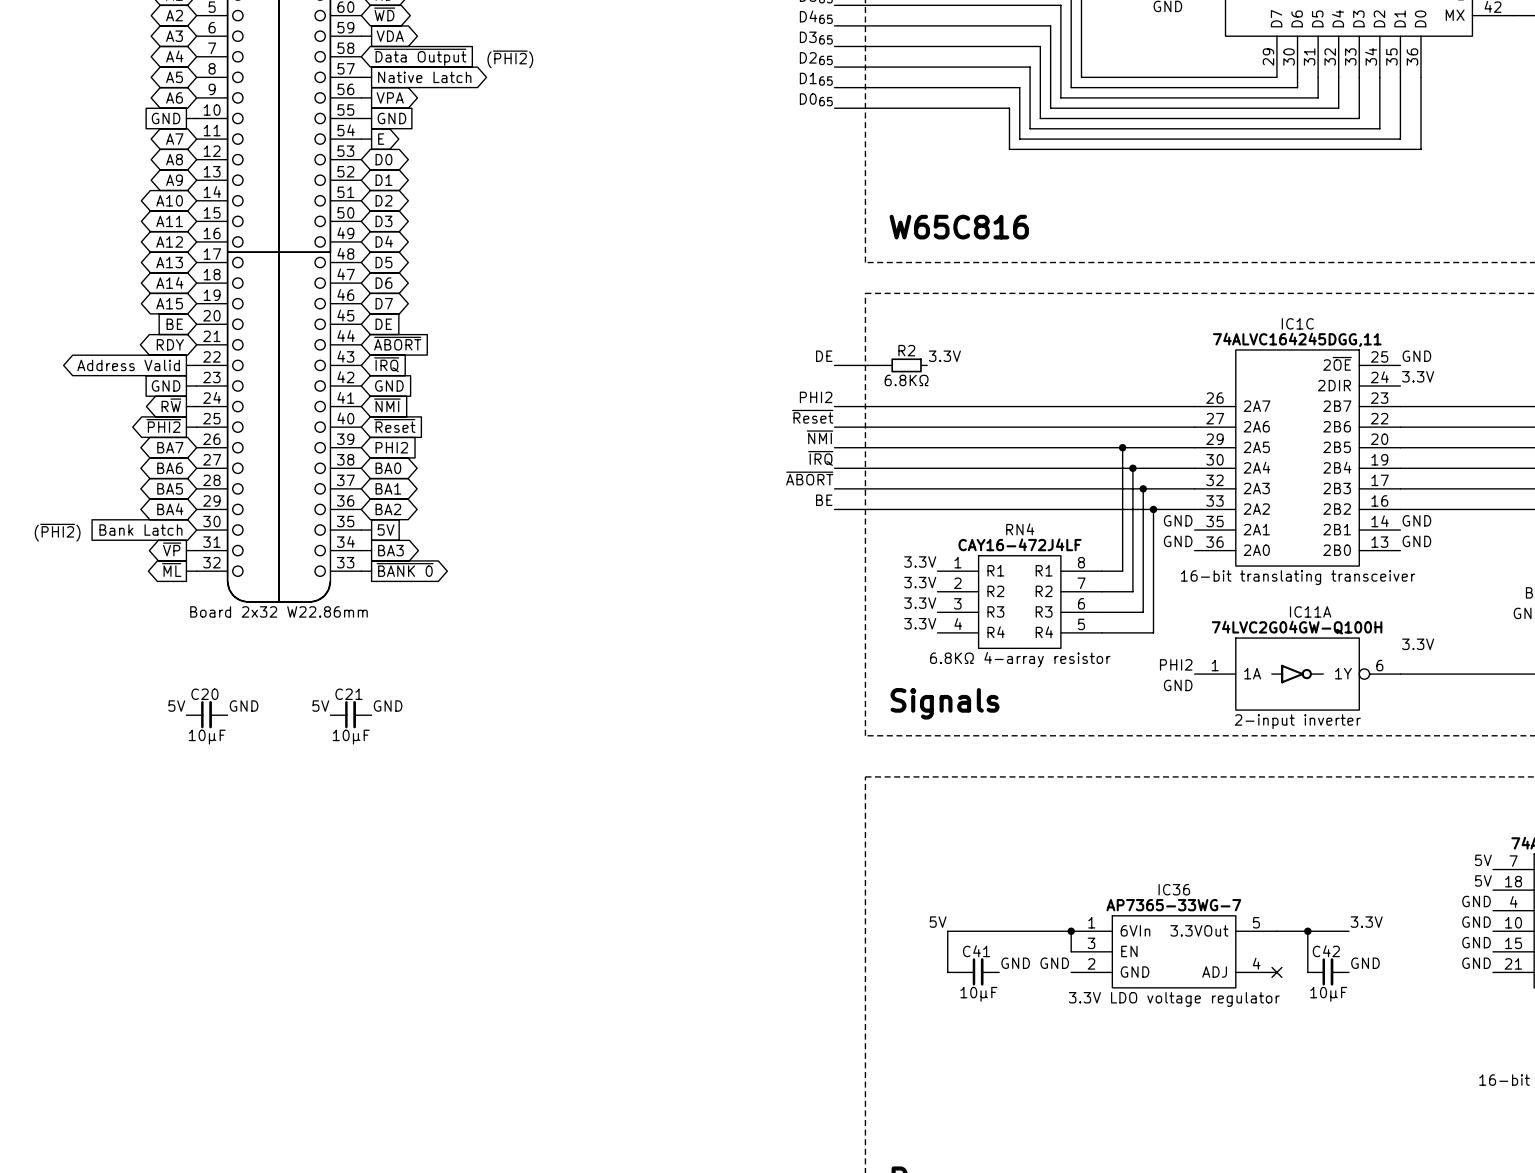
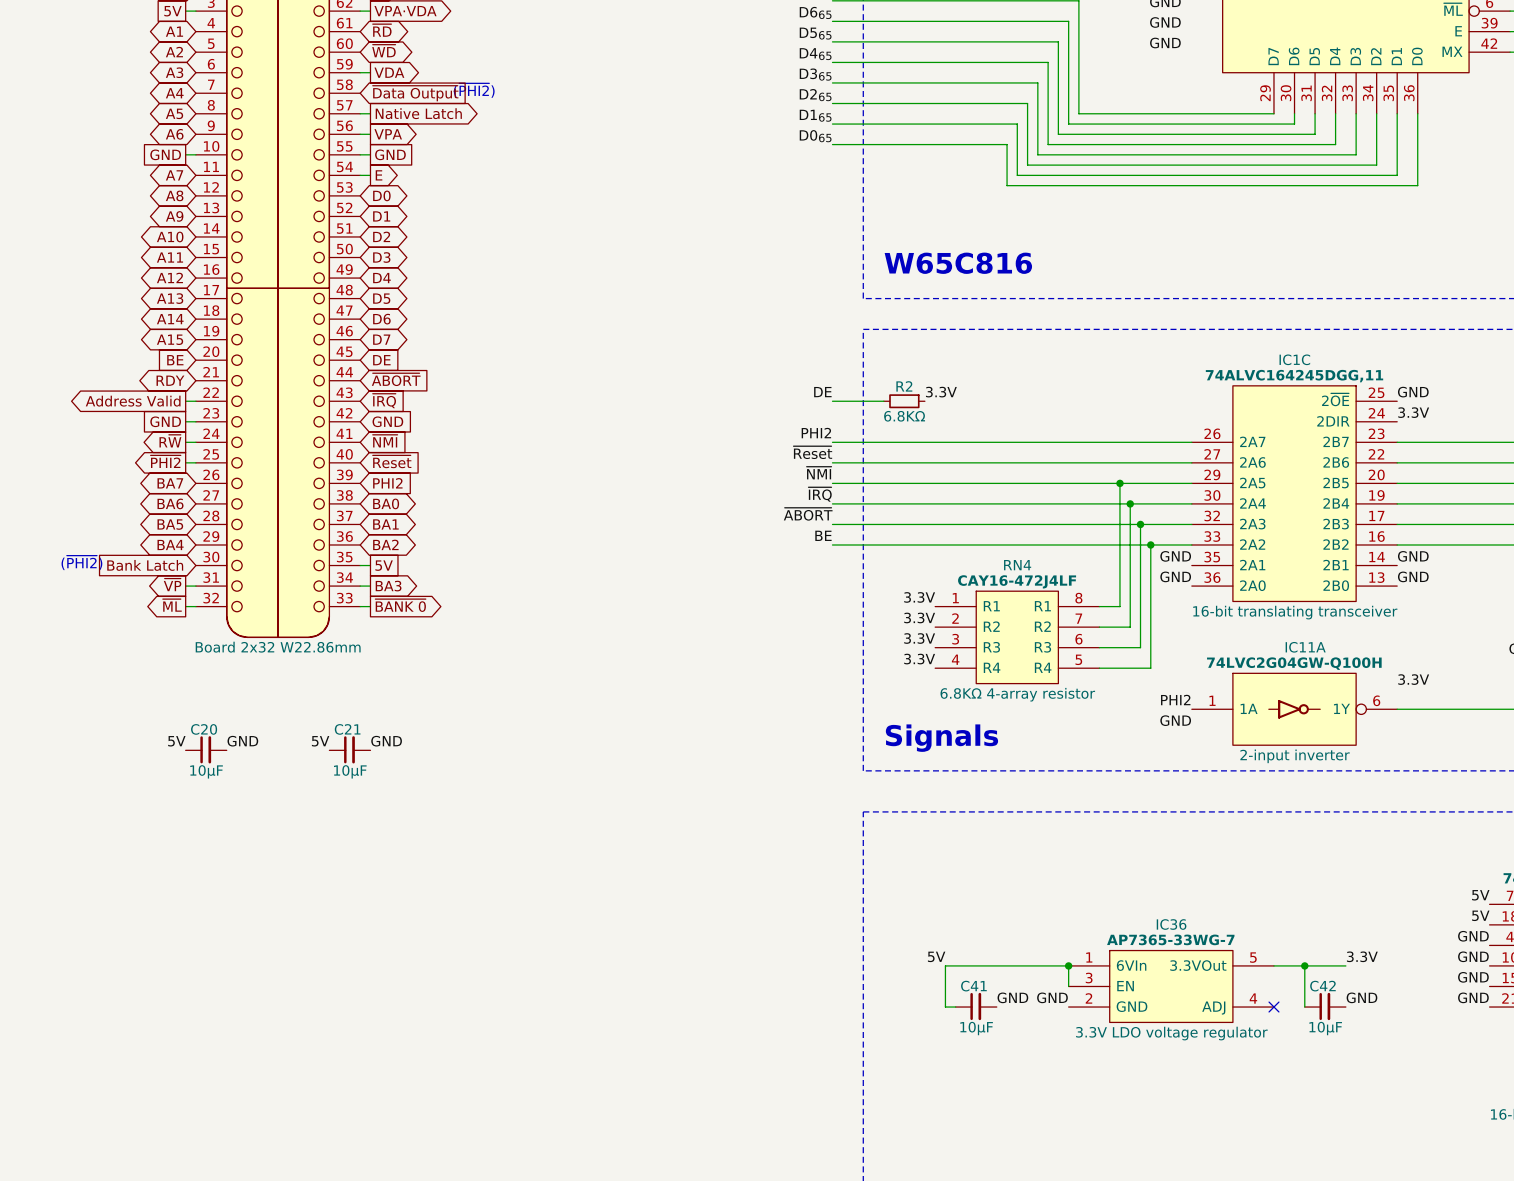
text position: (~{PHI2}) (510, 59) -> (~{PHI2}) (474, 90)
text position: (~{PHI2}) (57, 532) -> (~{PHI2}) (81, 562)

